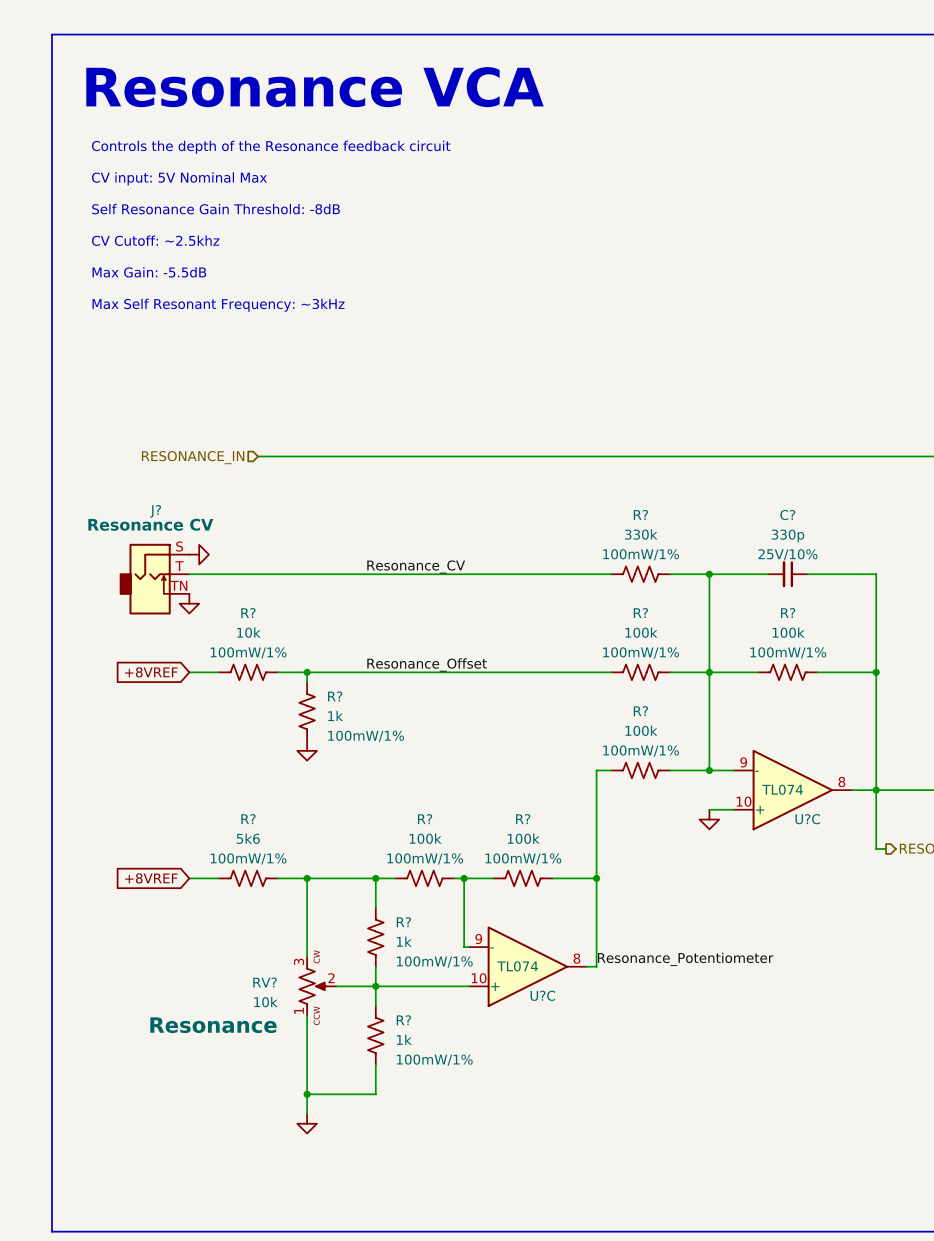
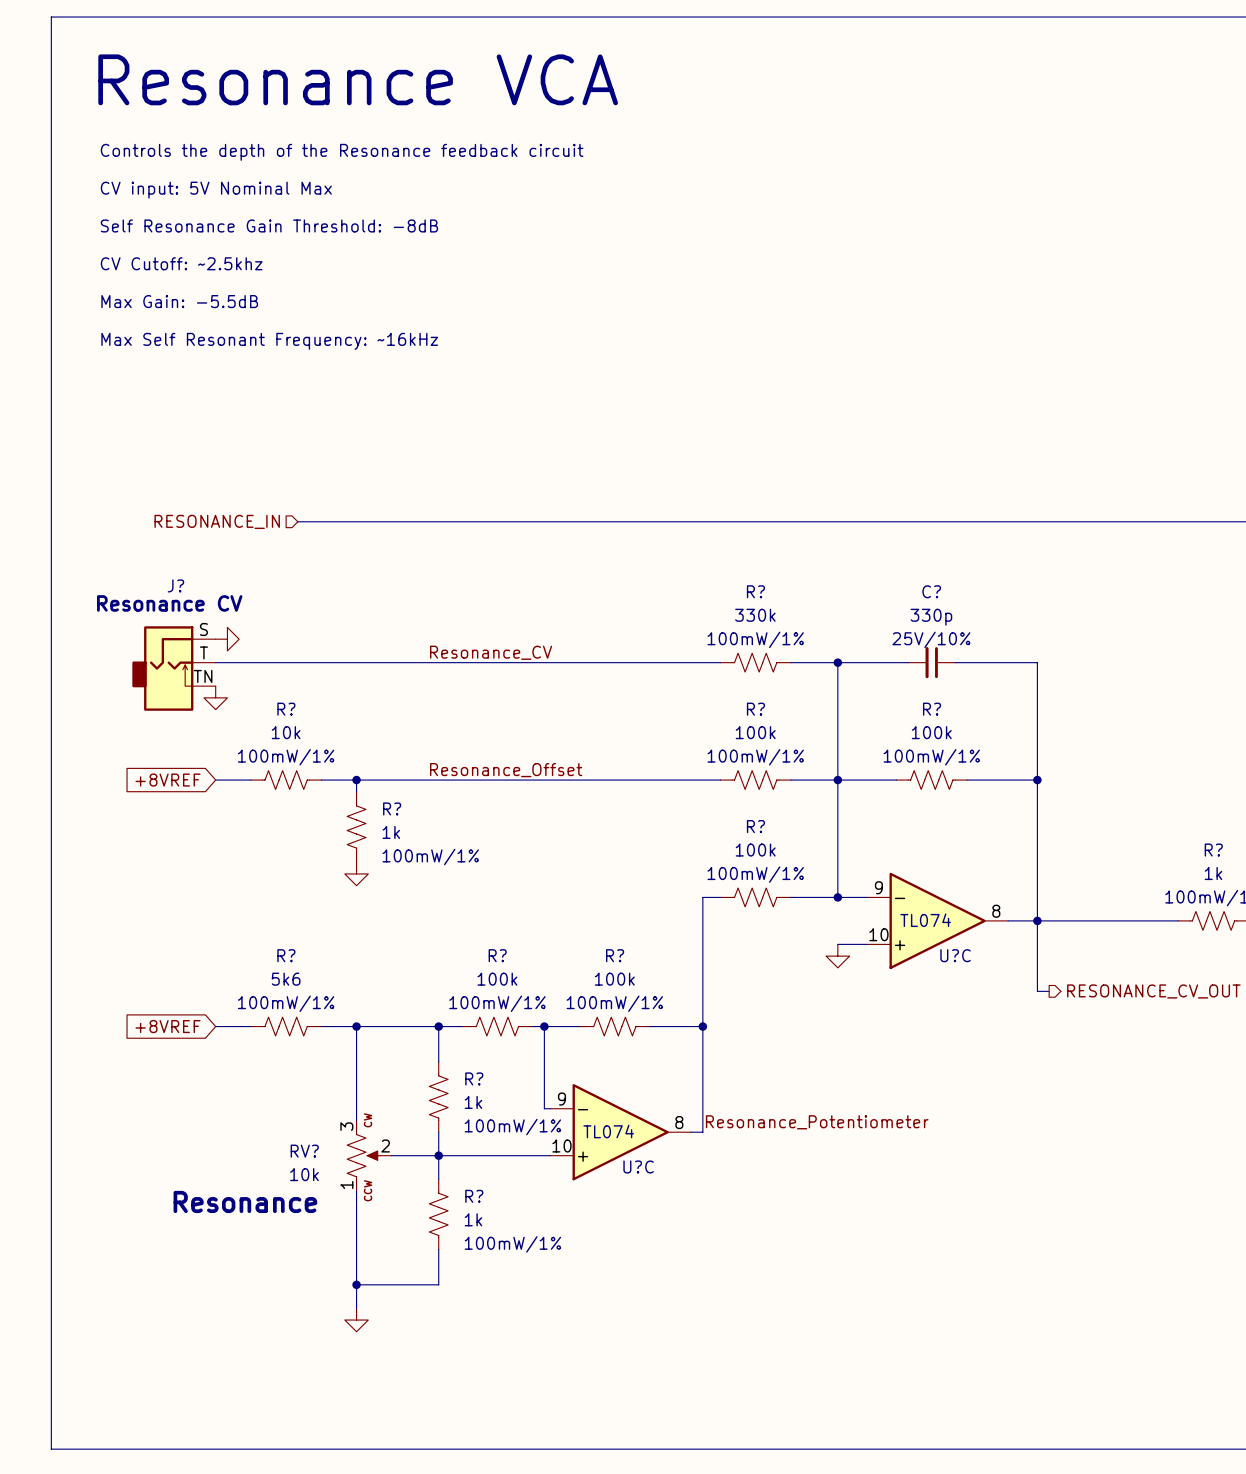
text: Max Self Resonant Frequency: ~3kHz (218, 305) -> Max Self Resonant Frequency: ~16kHz (269, 341)

